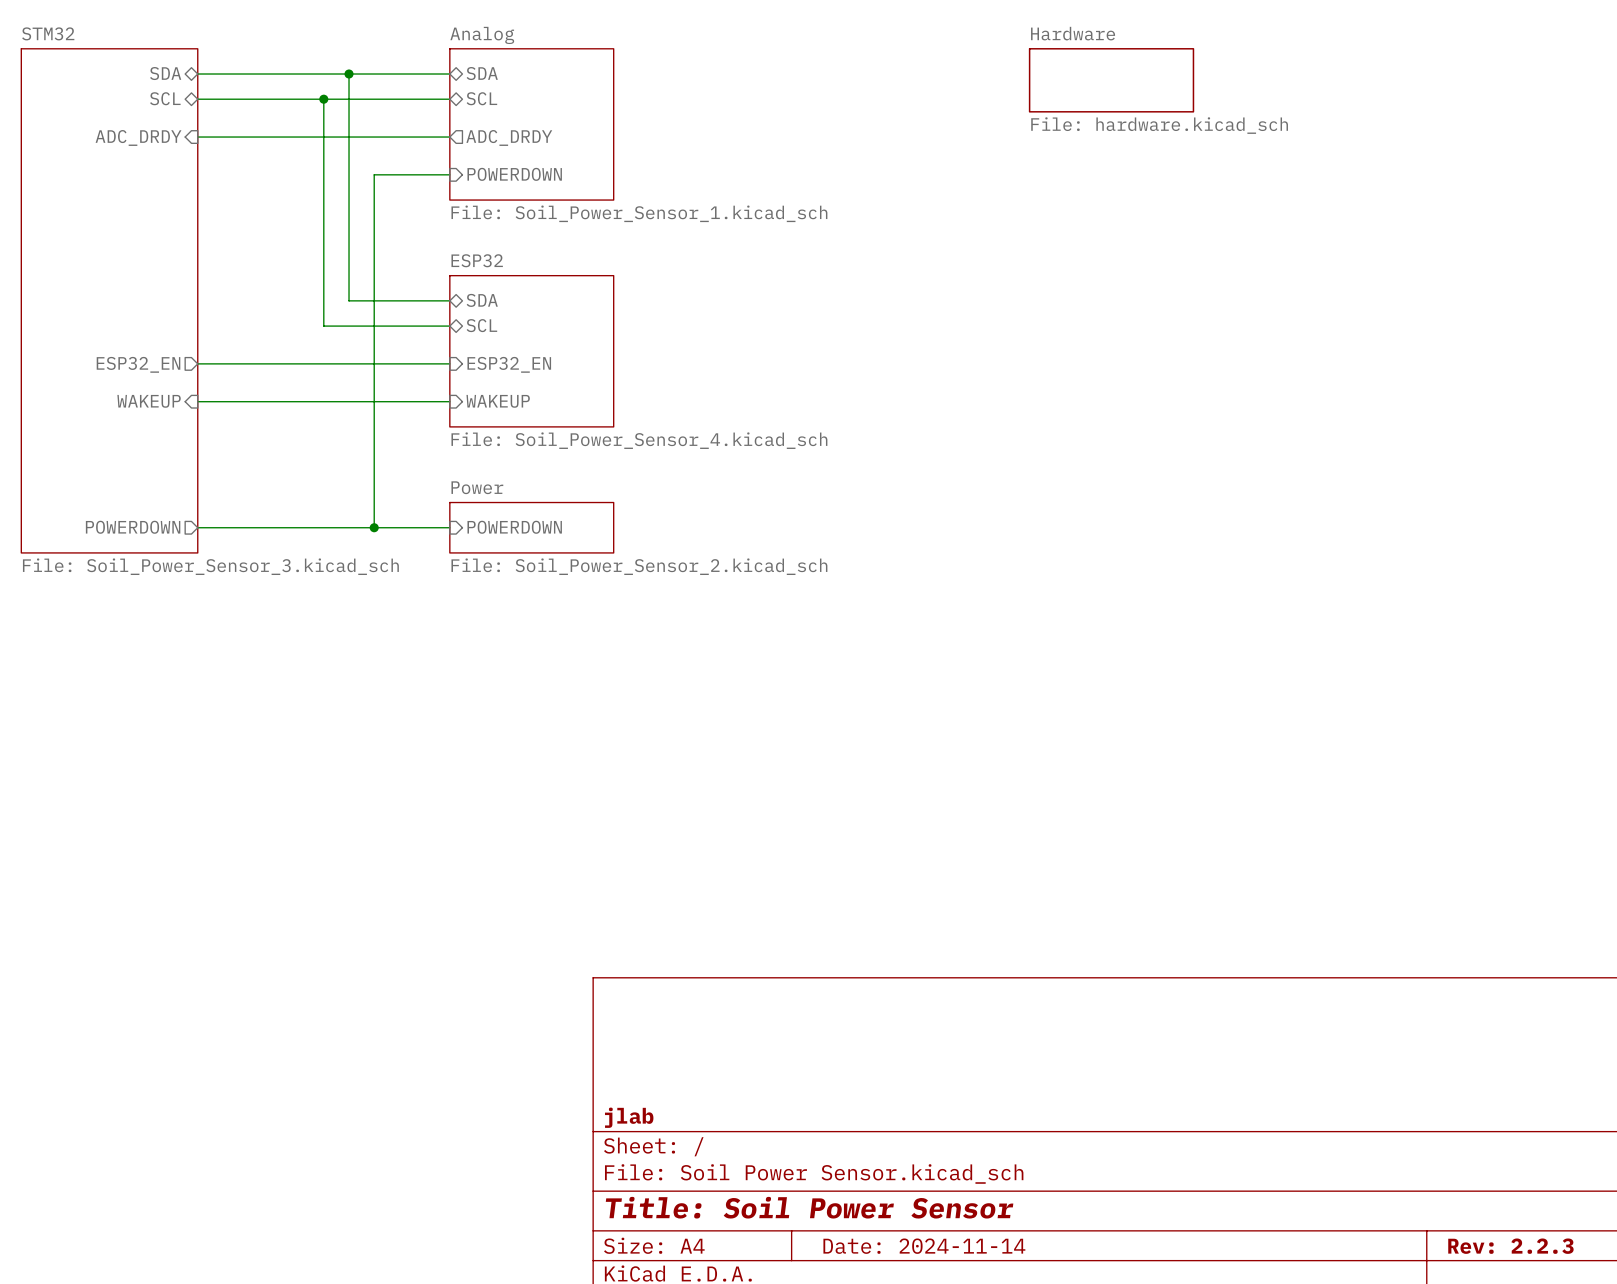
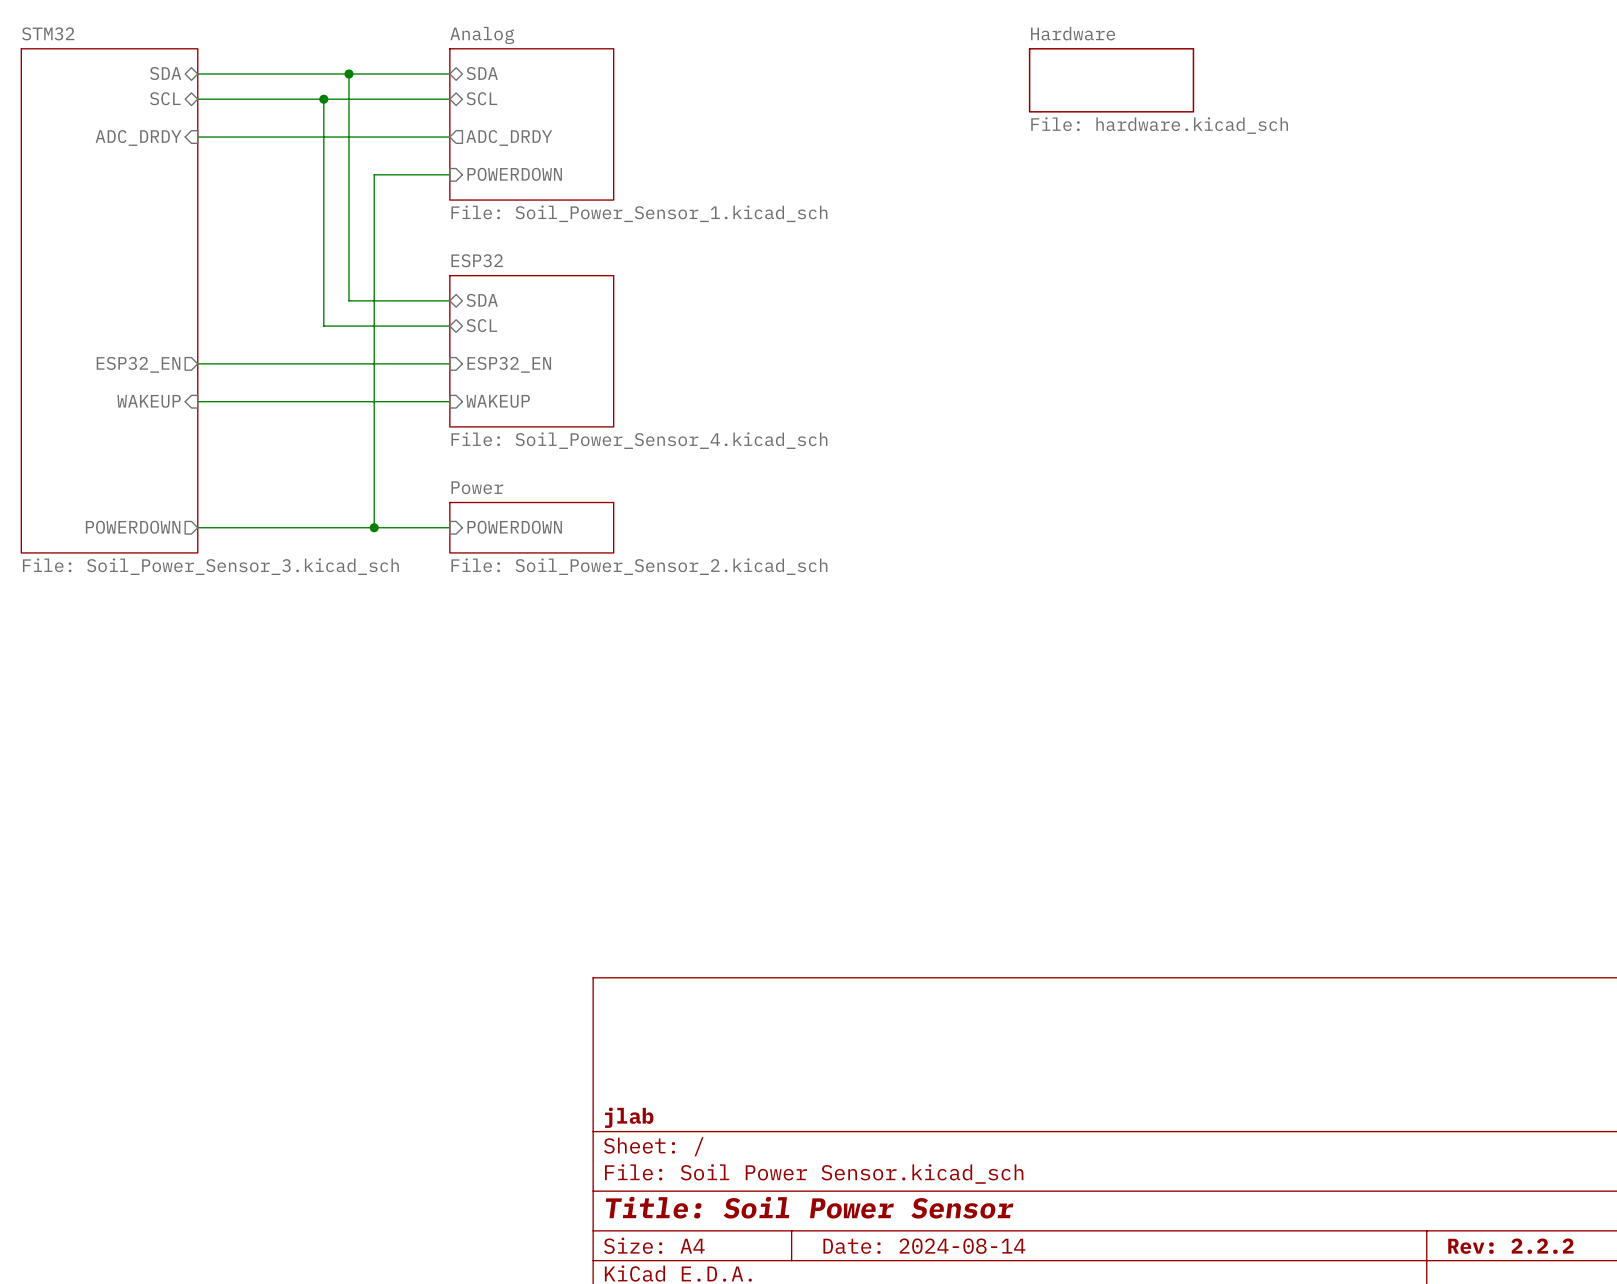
title block: Date: 2024-11-14 (924, 1246) -> Date: 2024-08-14 (924, 1246)
title block: Rev: 2.2.3 (1510, 1246) -> Rev: 2.2.2 (1510, 1246)

